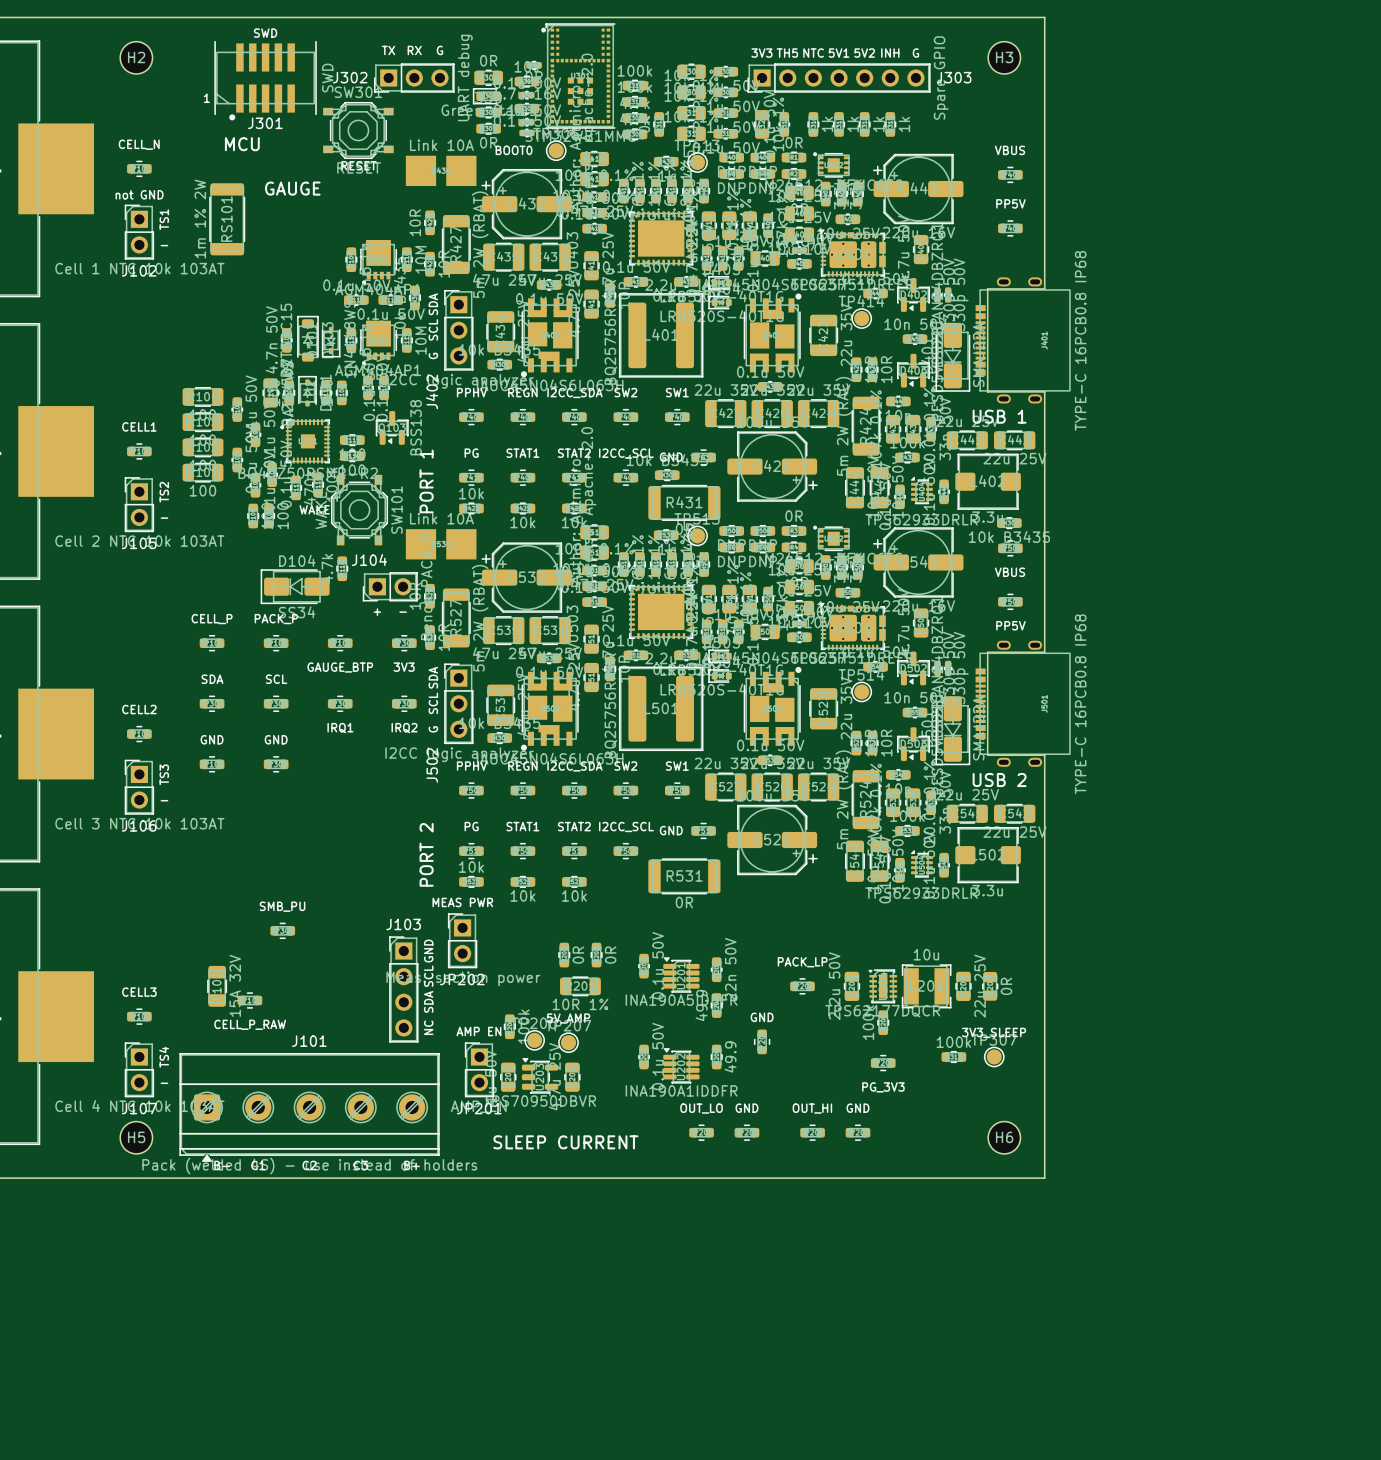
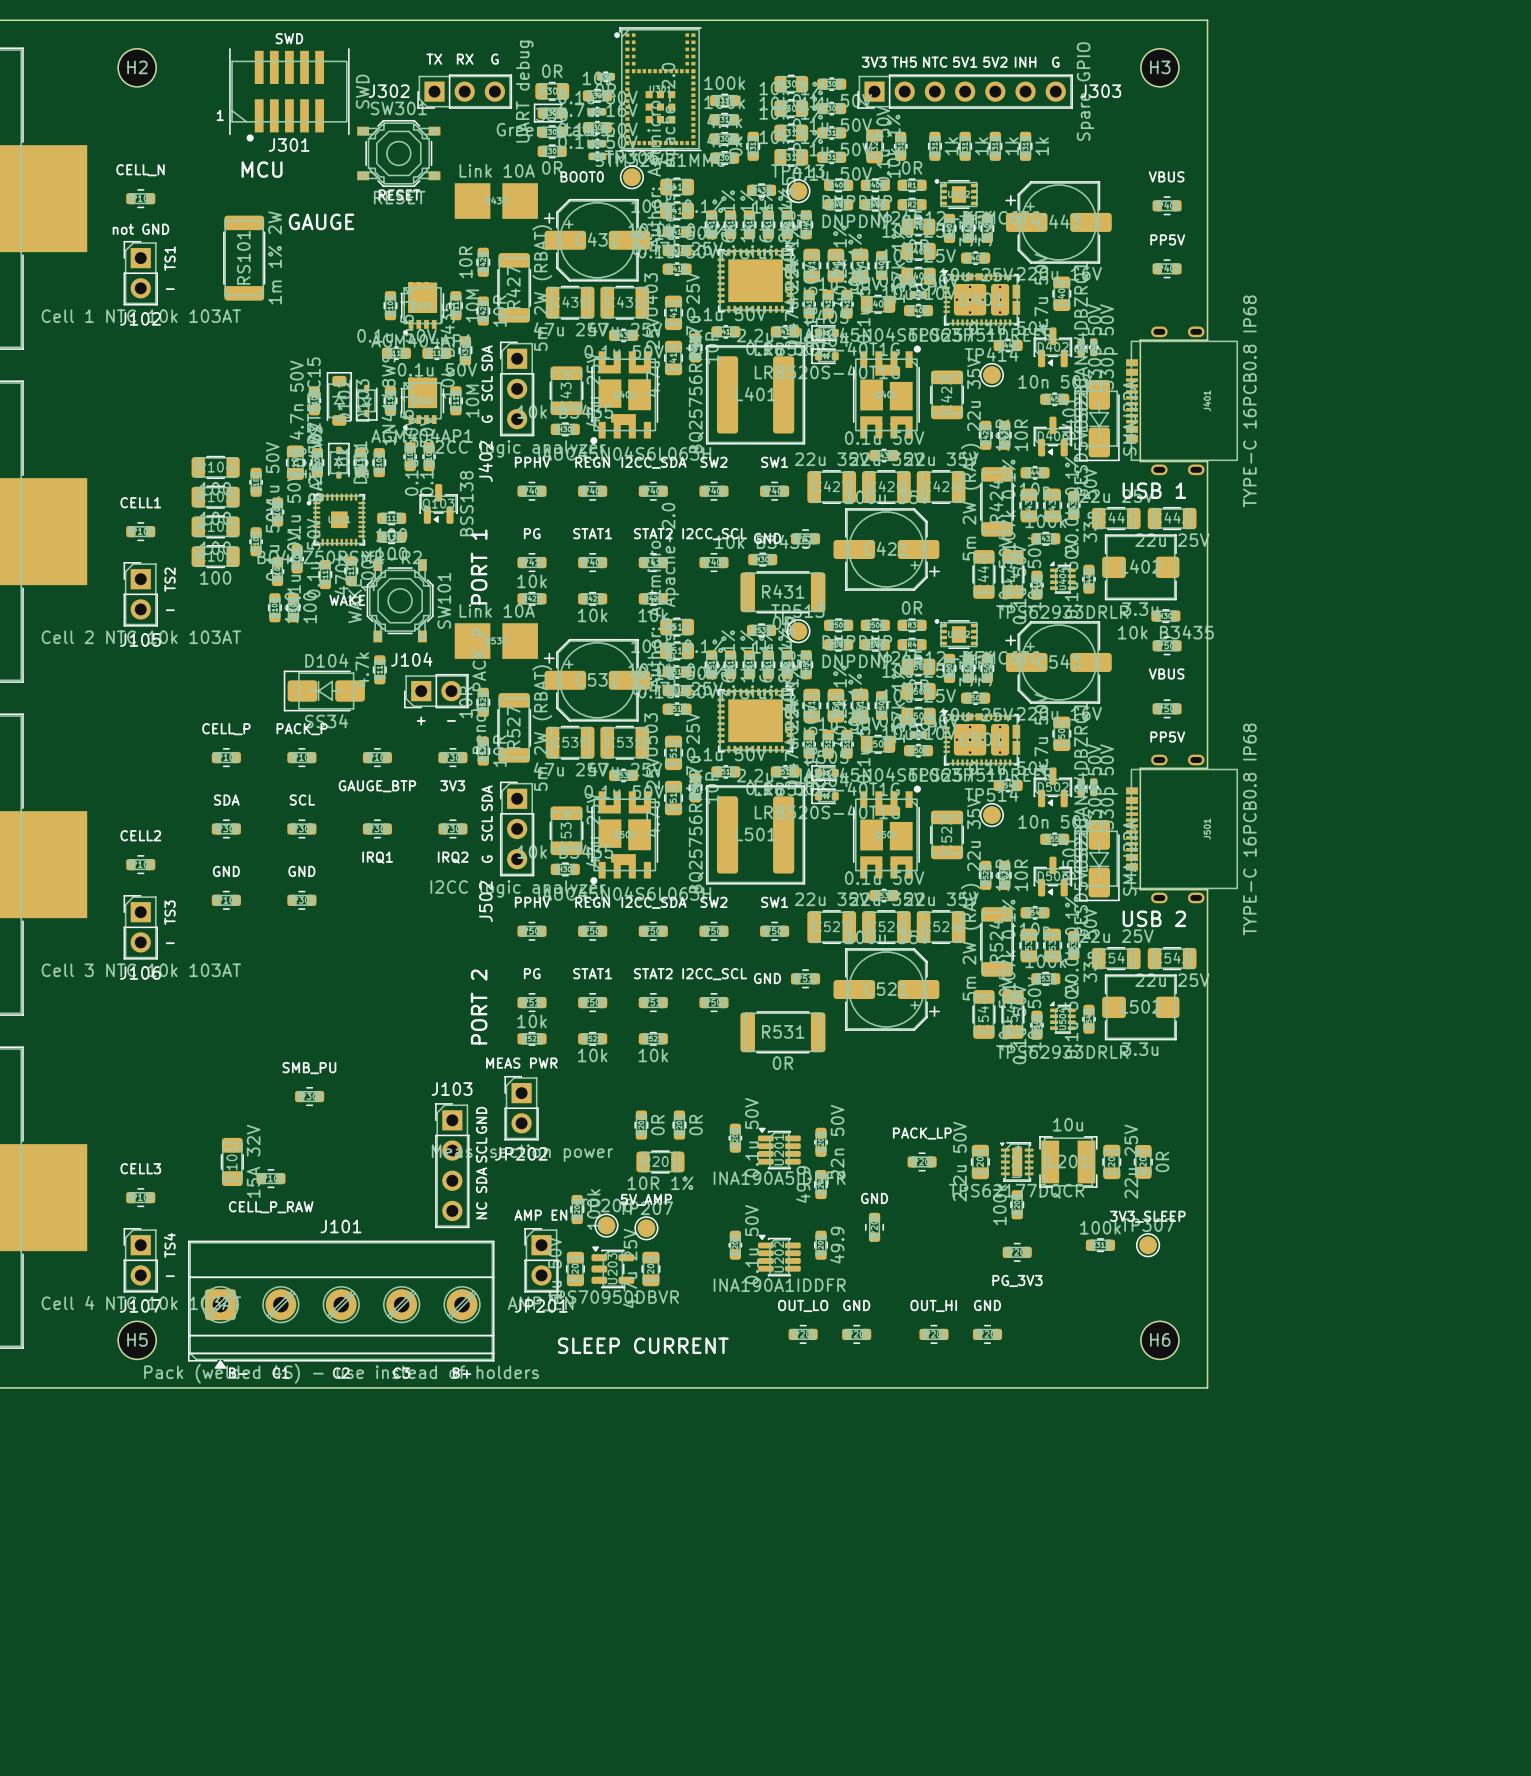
RS101 value position: 1m 1% 2W (200, 219) -> 1m 1% 2W (275, 257)

